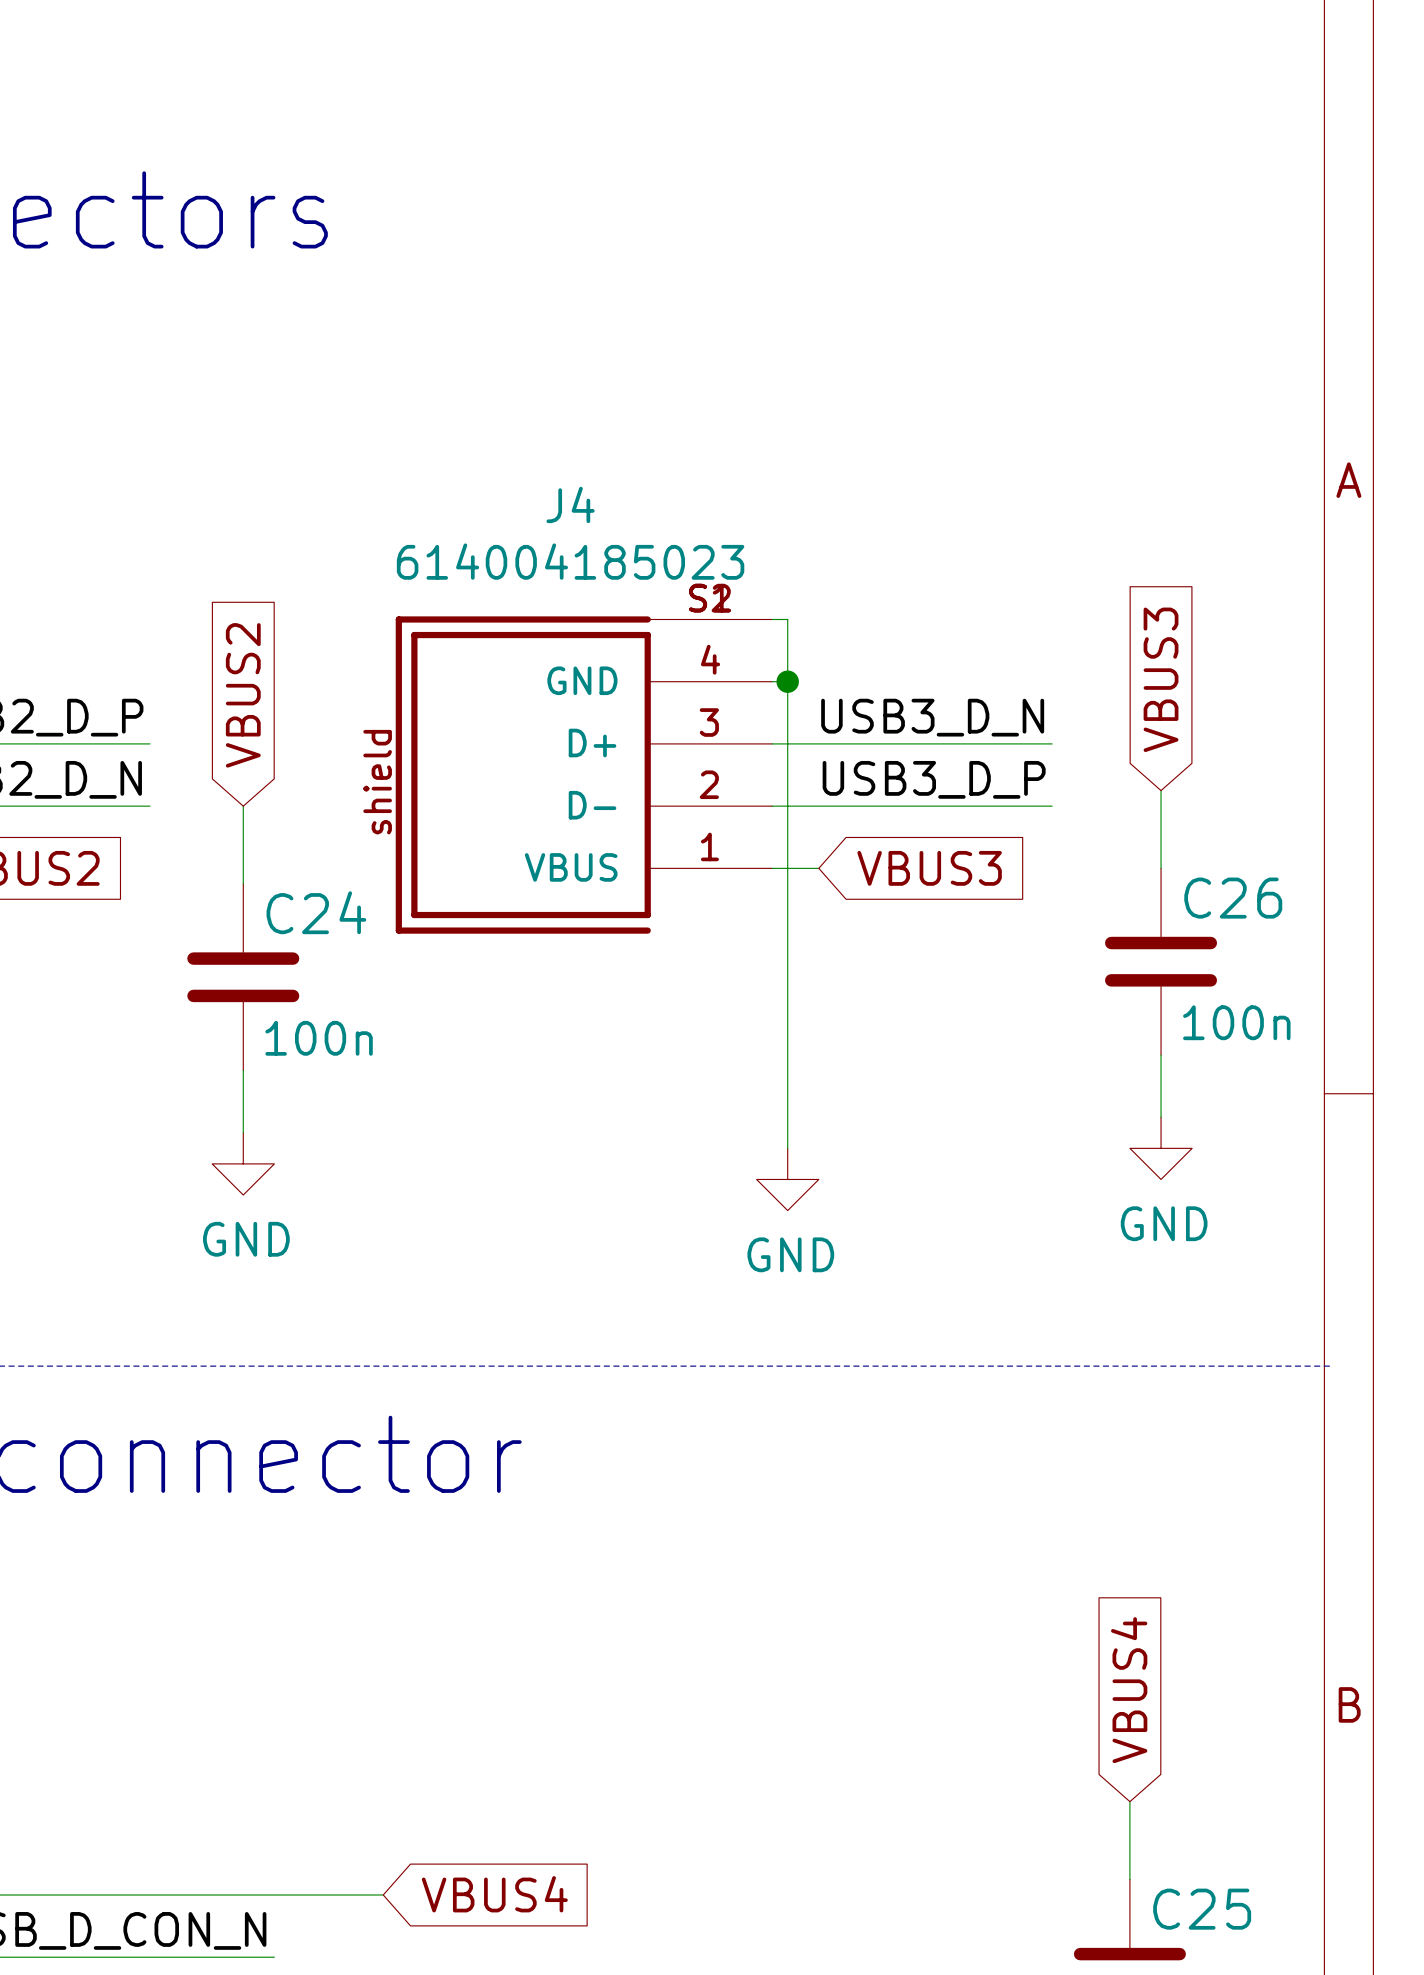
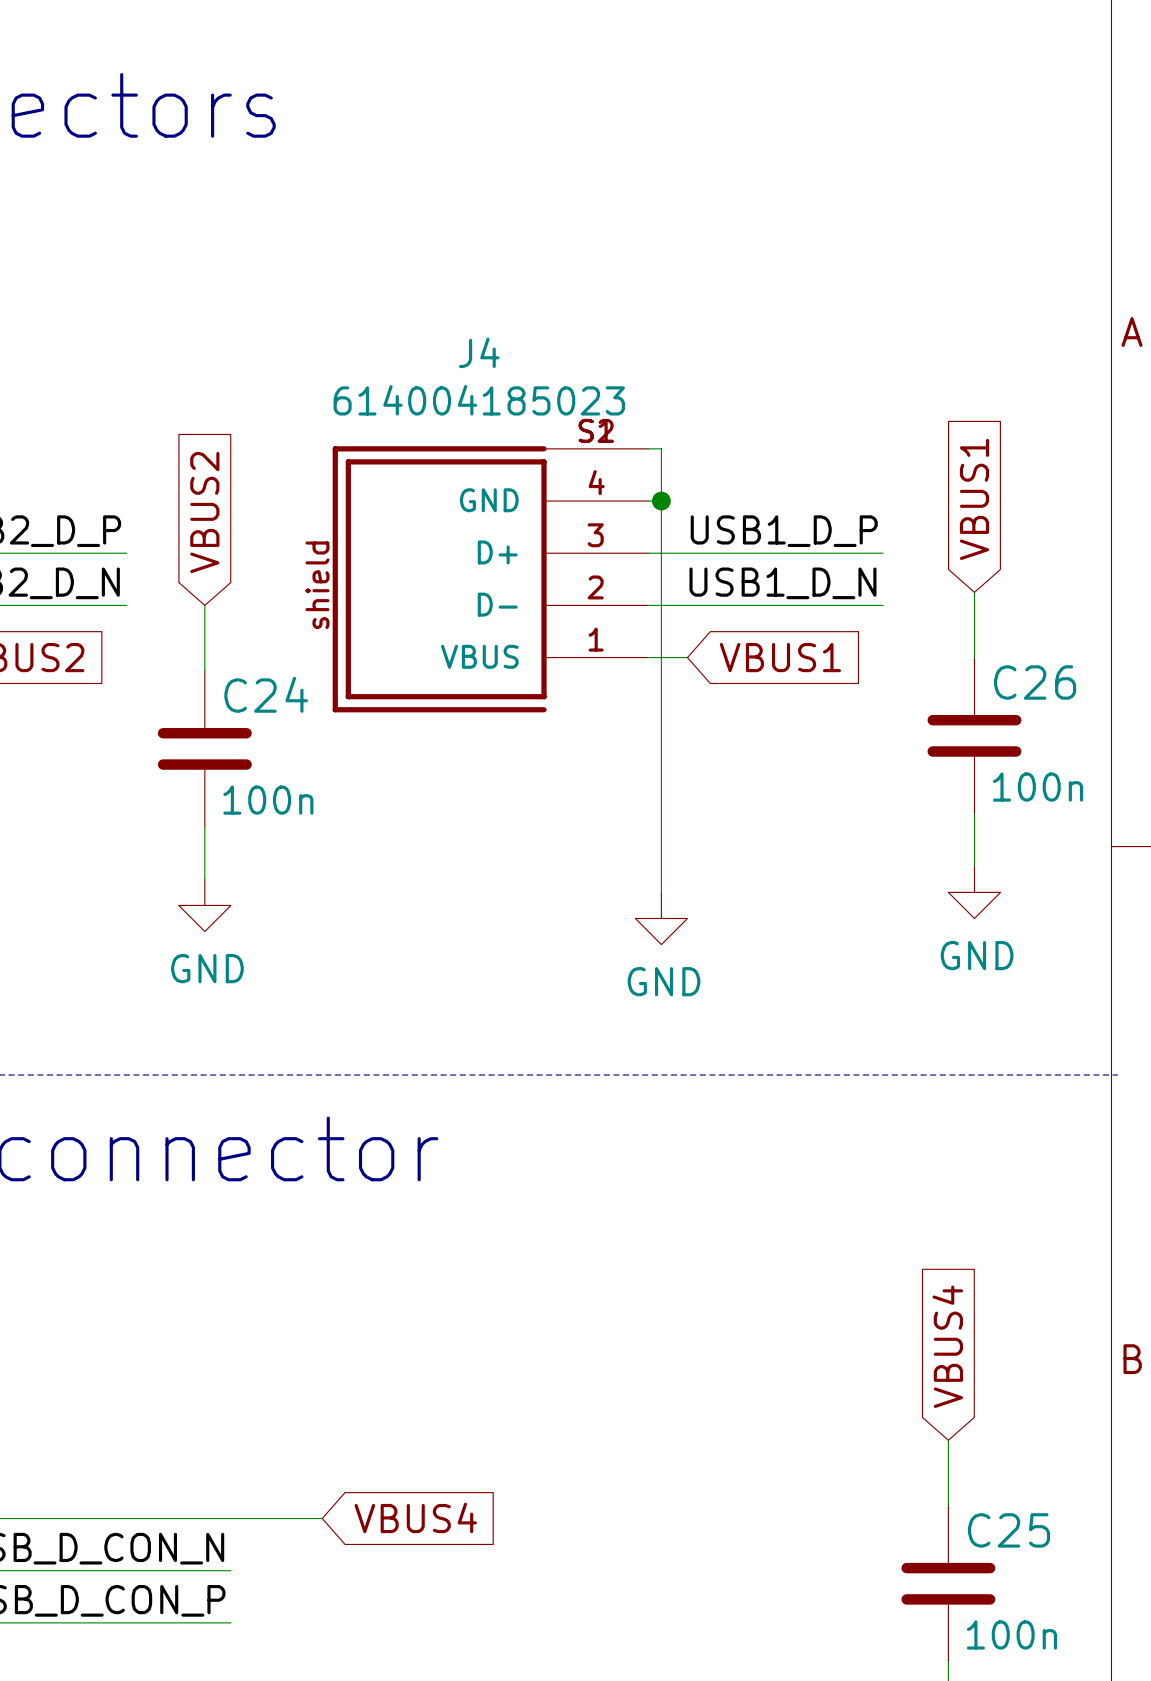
global label: VBUS3 (1161, 679) -> VBUS1 (974, 499)
label: USB3_D_N (932, 717) -> USB1_D_P (784, 531)
label: USB3_D_P (934, 779) -> USB1_D_N (782, 583)
global label: VBUS3 (929, 868) -> VBUS1 (780, 657)

